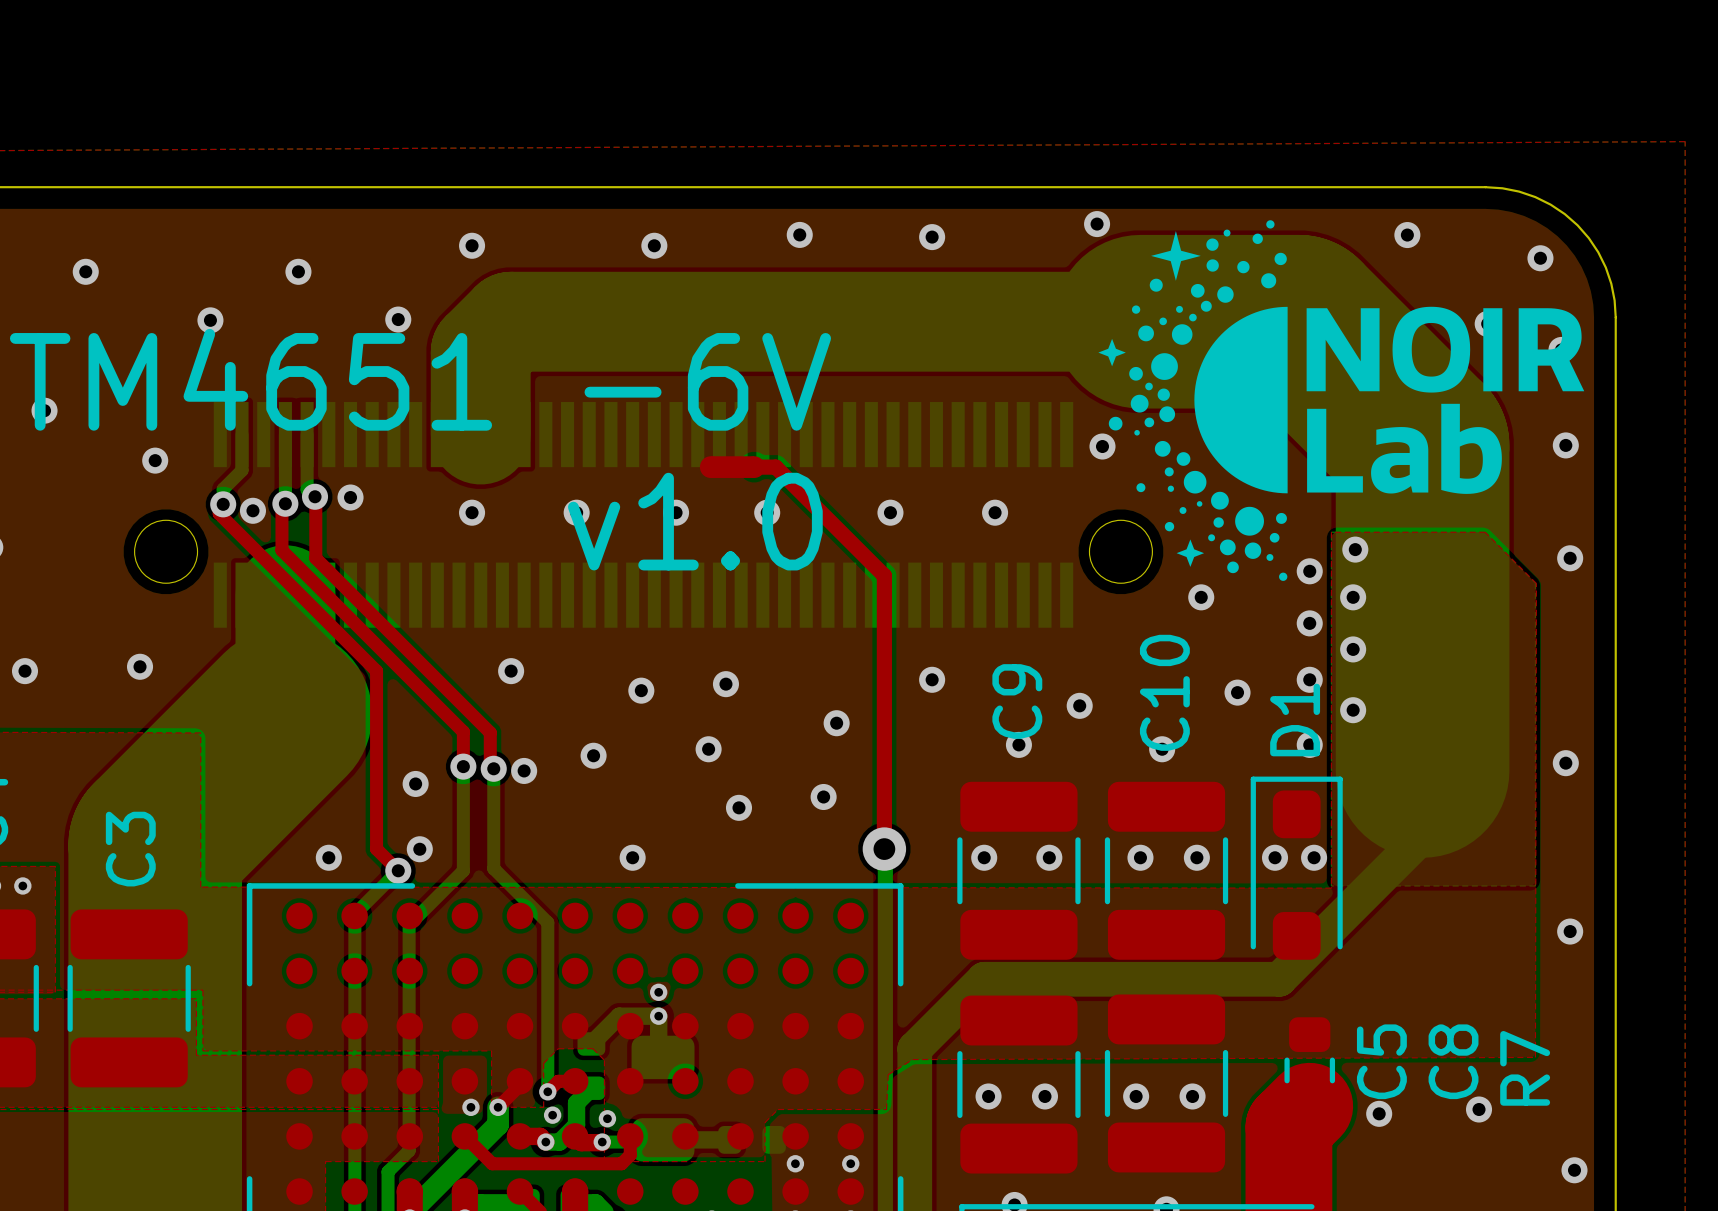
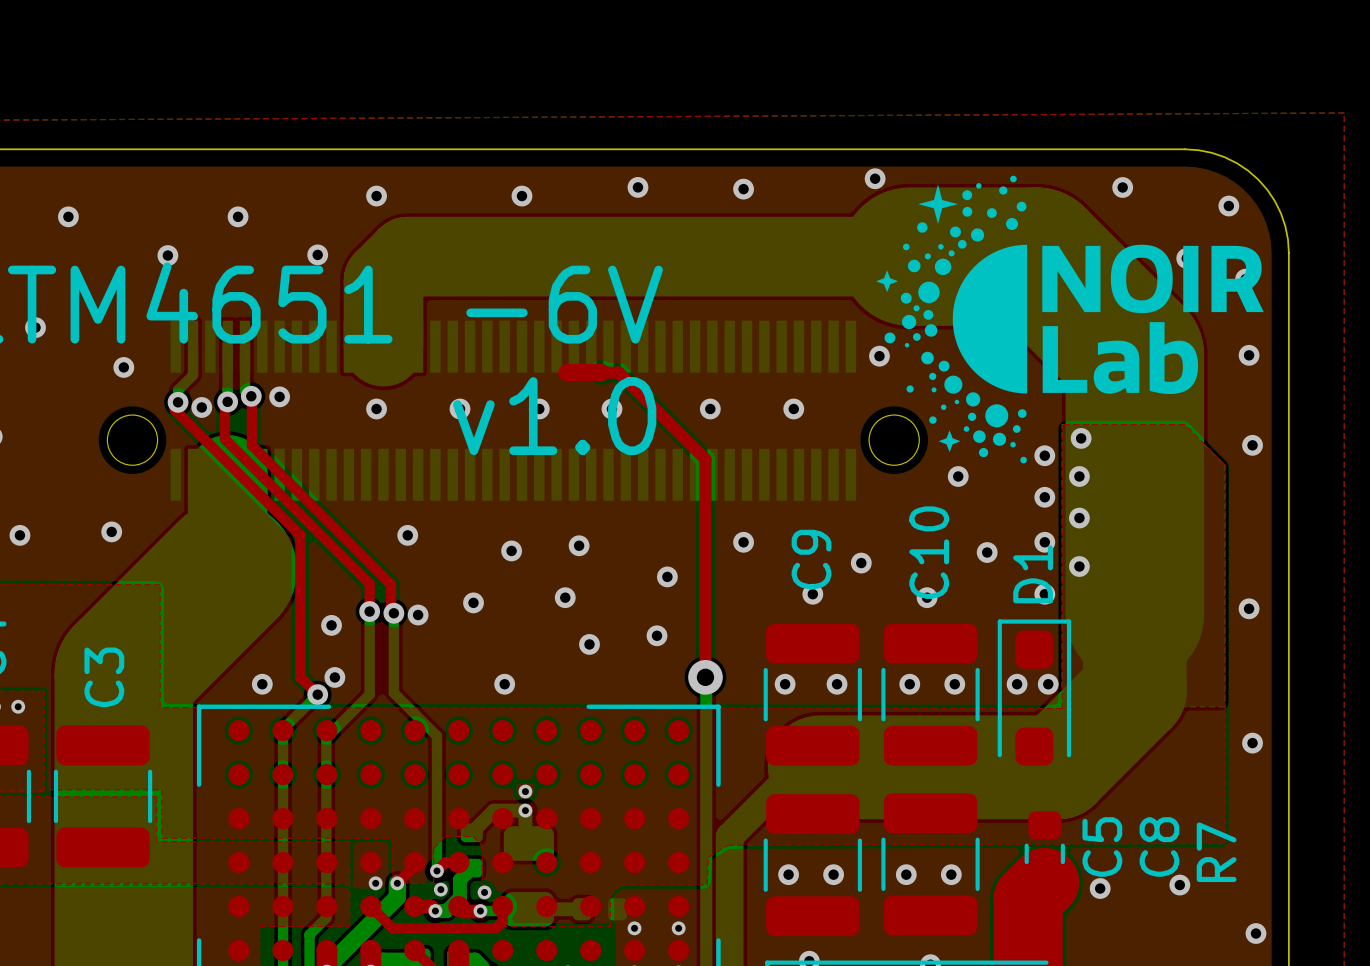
bottom track: (1422, 836) (1279, 979) (984, 979) -> (1134, 615) (1134, 690) (1058, 767) (798, 767) (785, 781)

